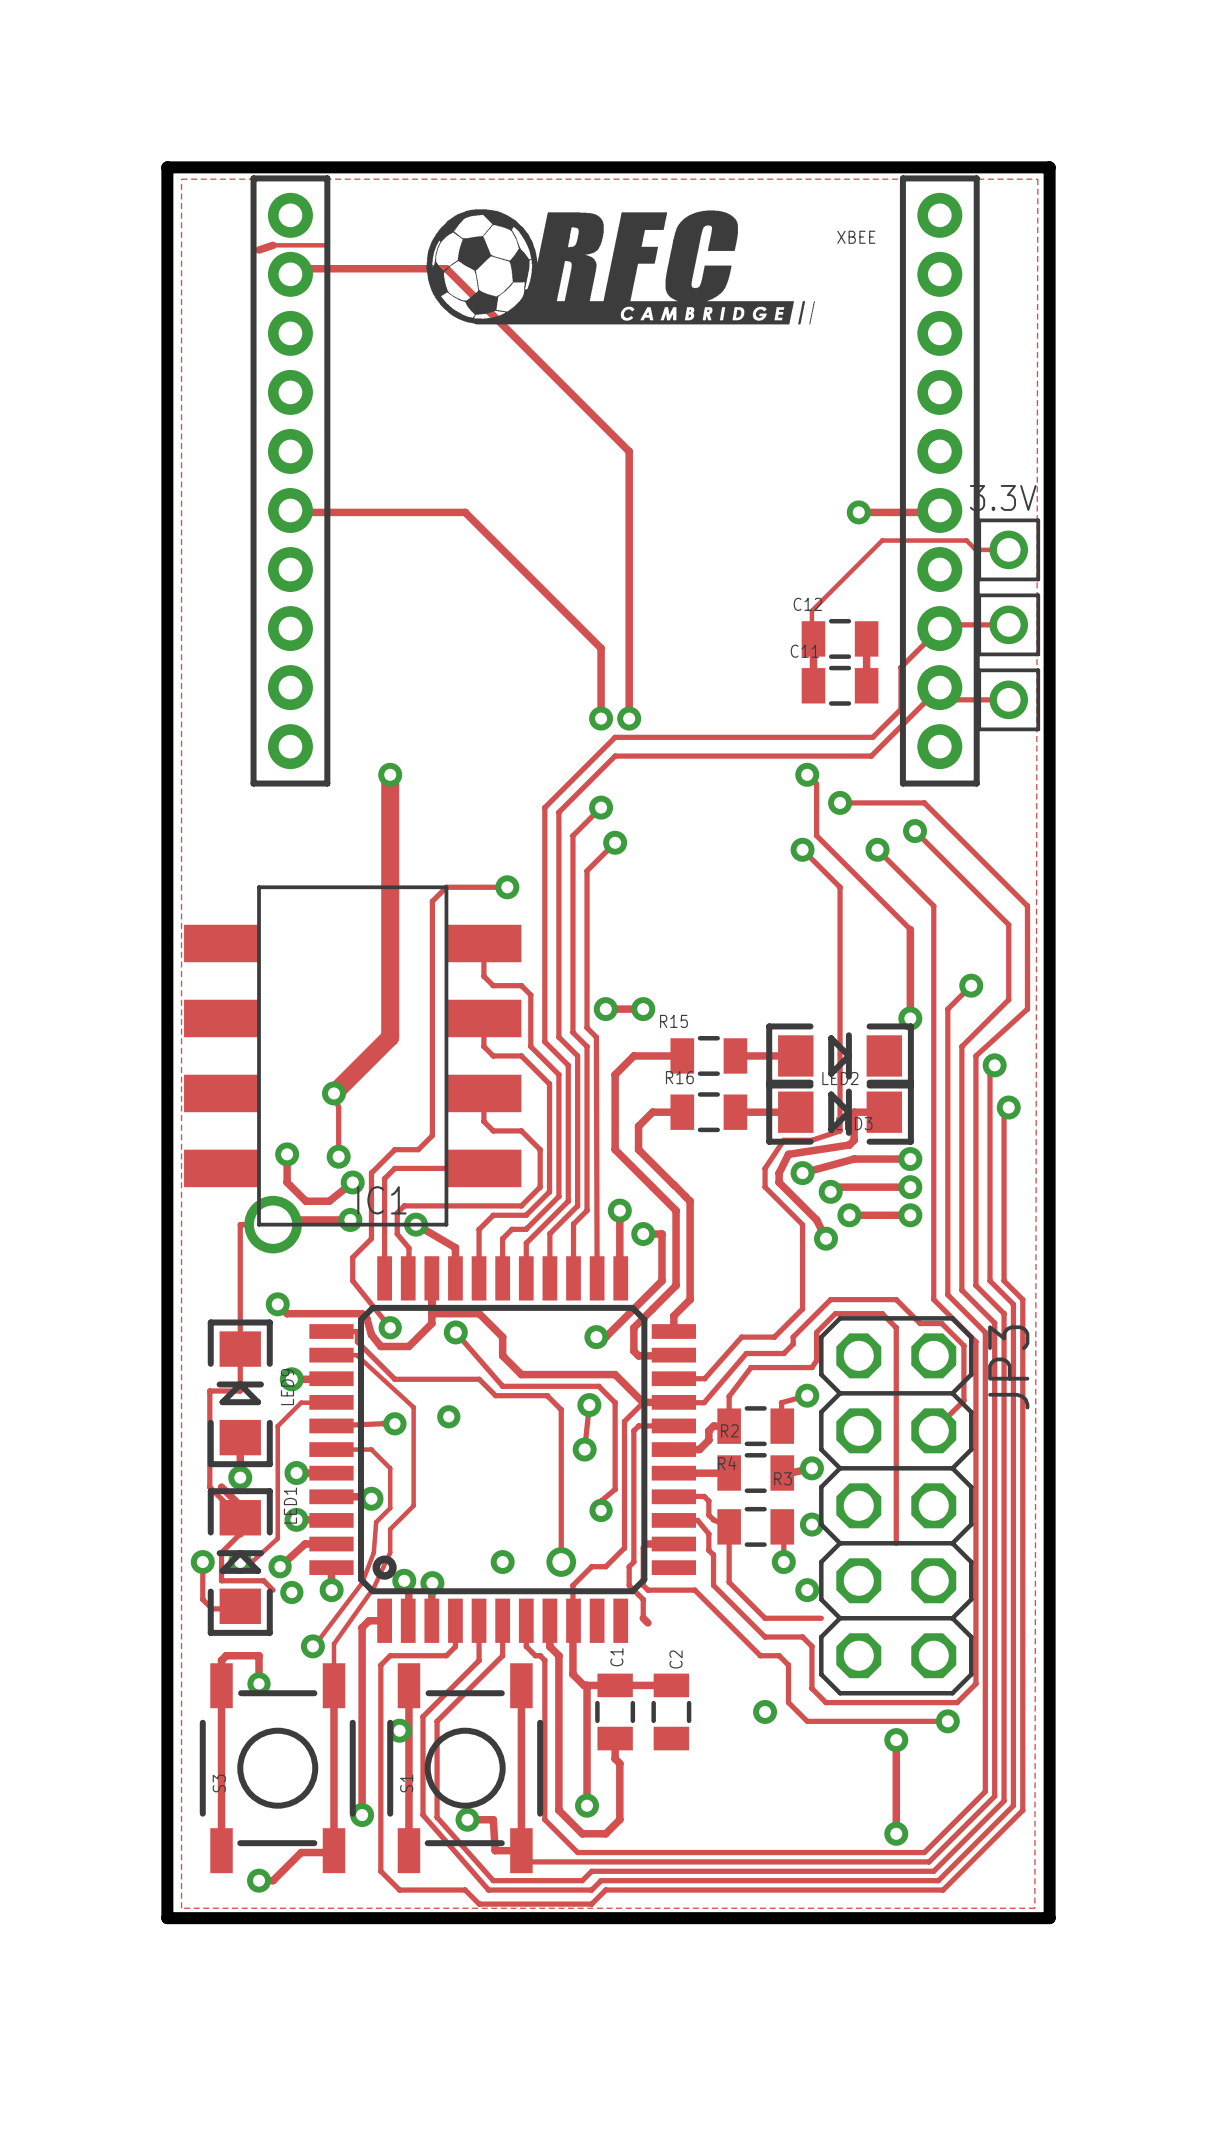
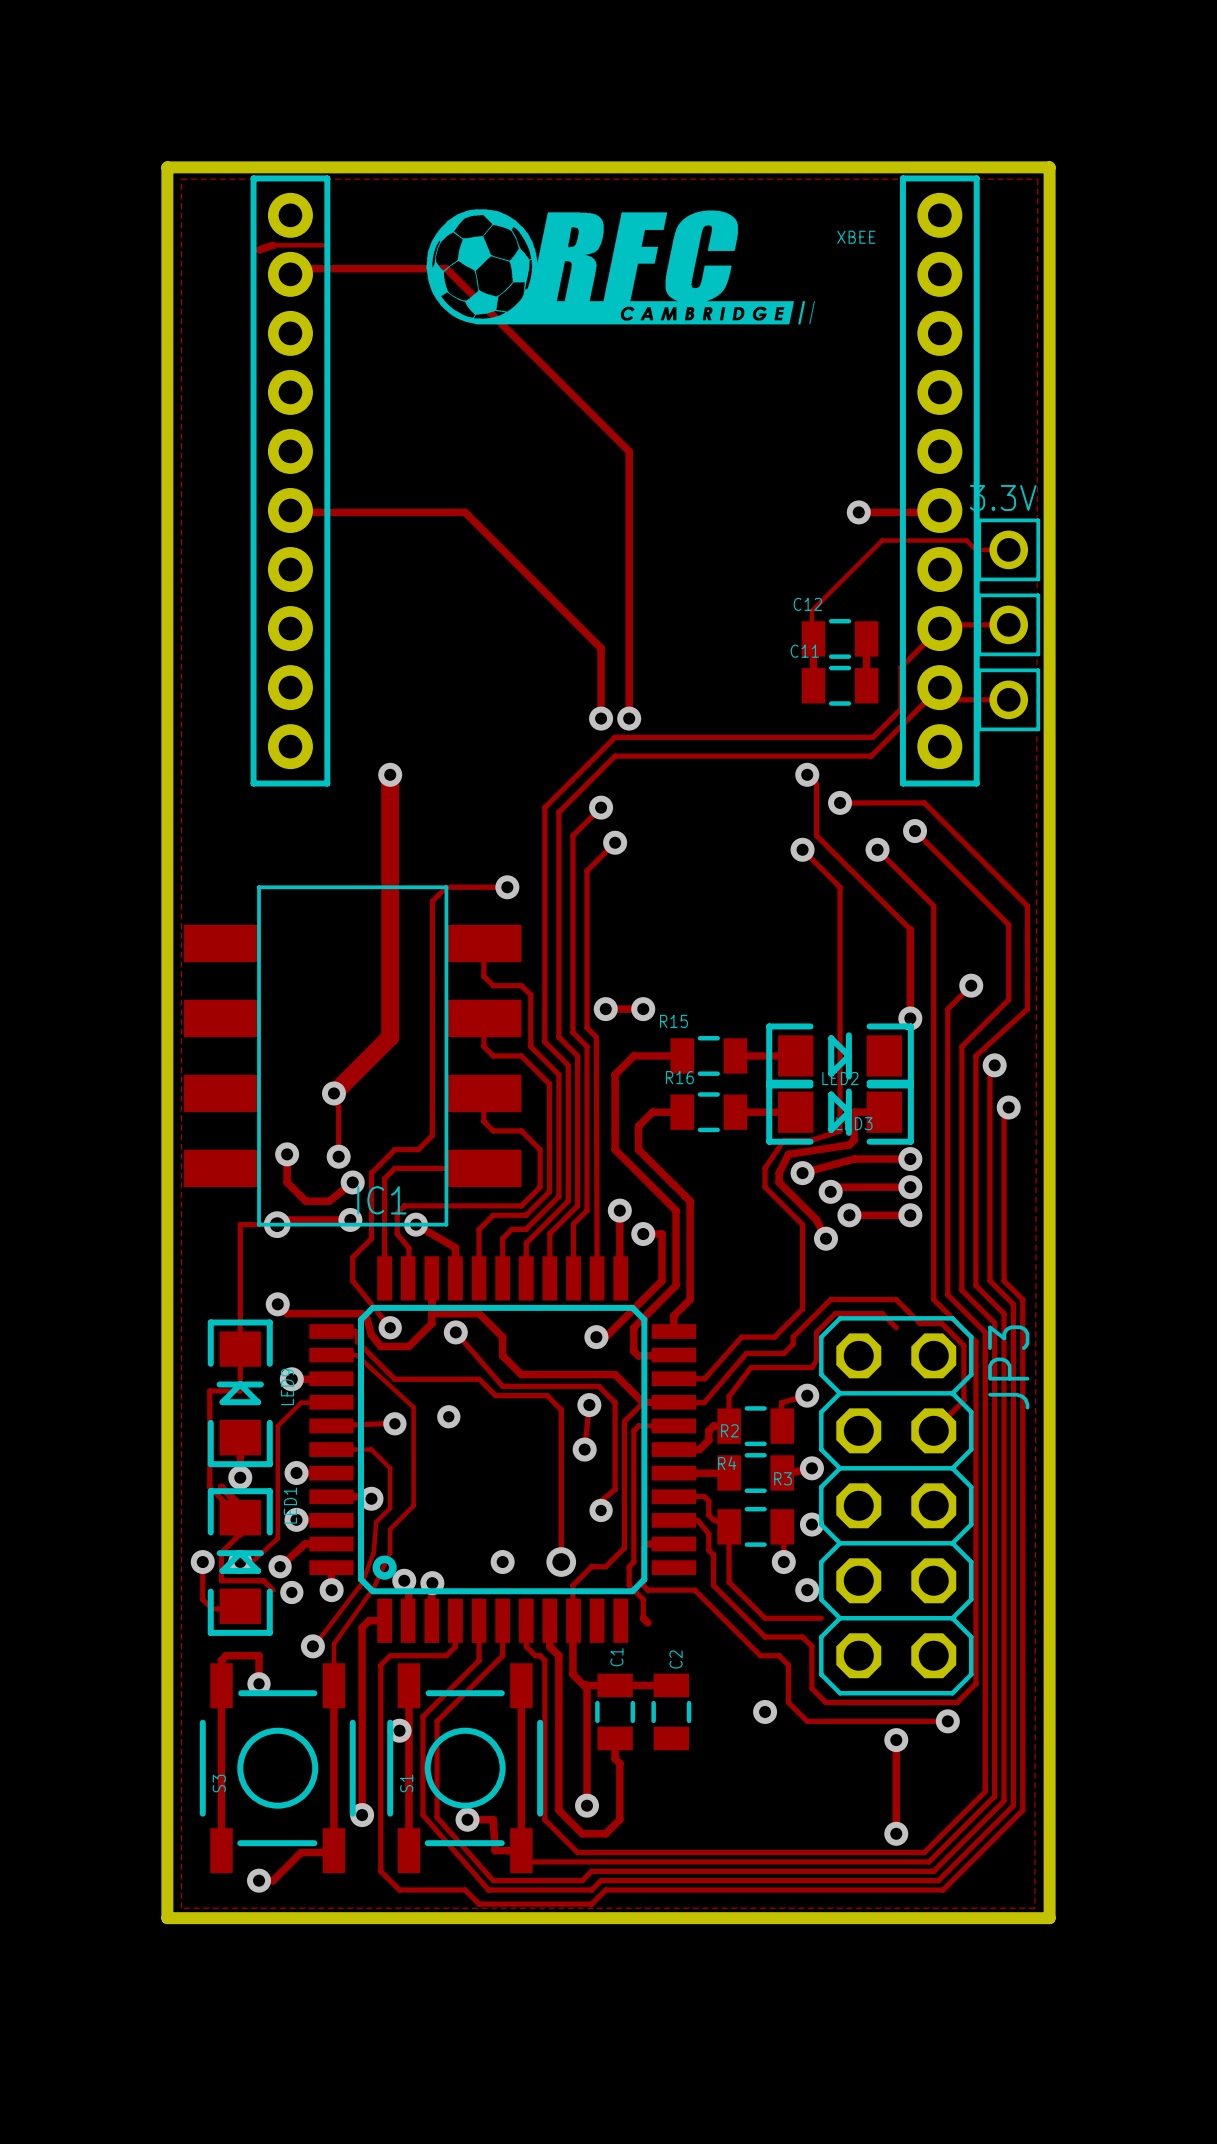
via size: [244, 1195, 302, 1254] -> [263, 1211, 291, 1239]
track: (896, 1327) (896, 1543) -> none

